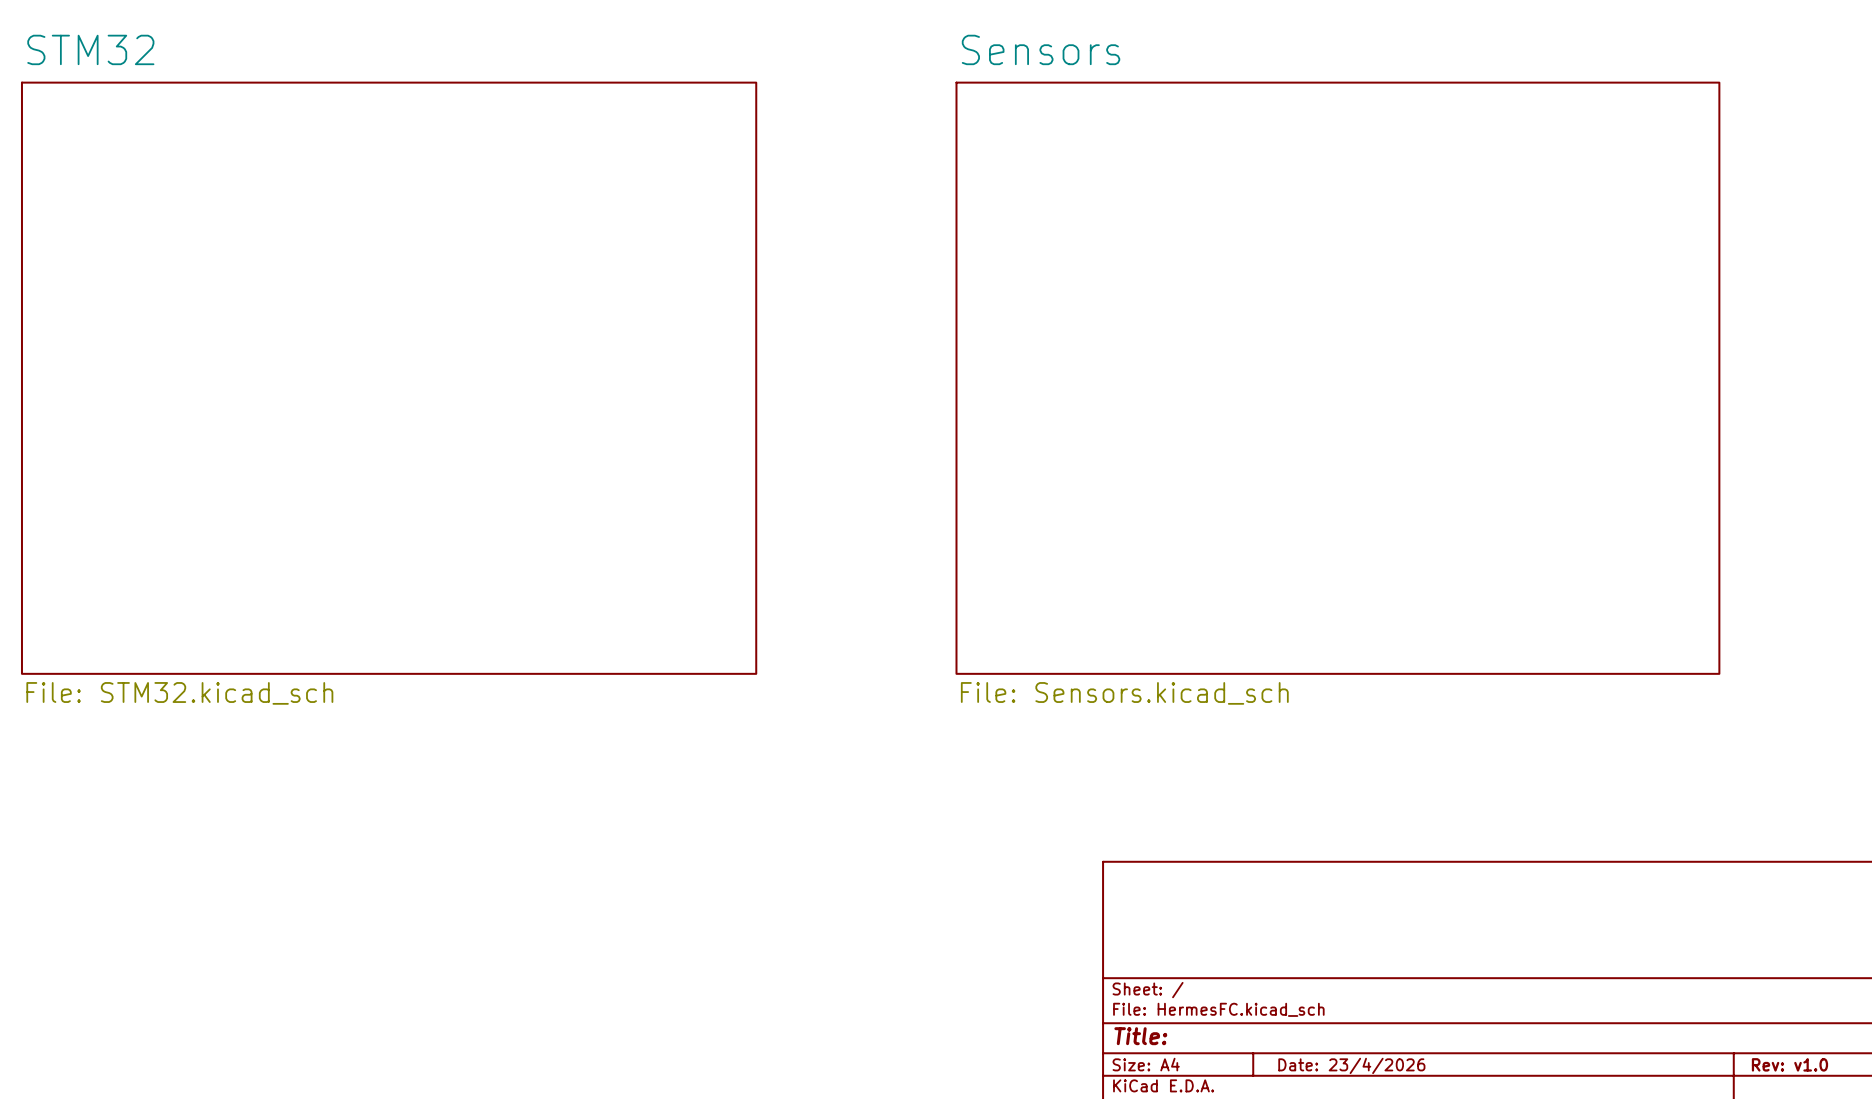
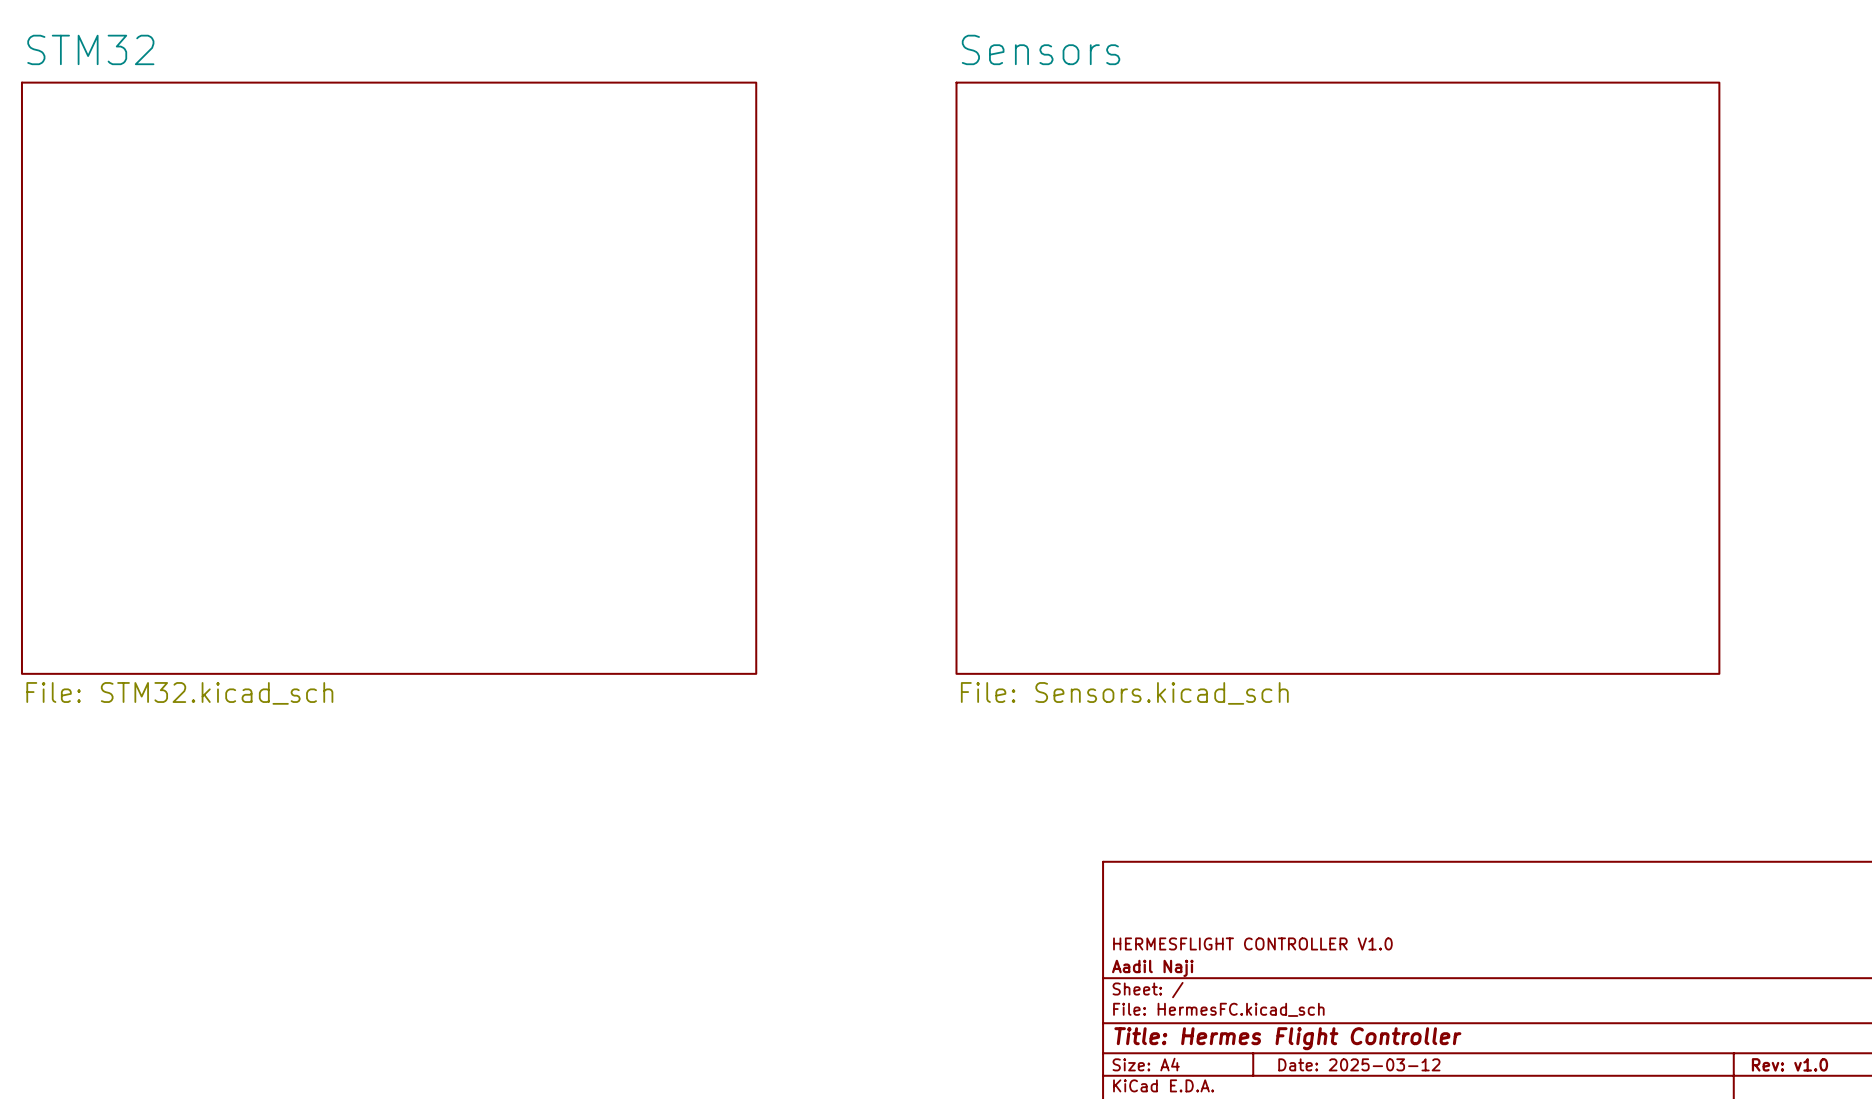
title block: none -> HERMESFLIGHT CONTROLLER V1.0 (1252, 943)
title block: none -> Aadil Naji (1152, 968)
title block: Title: (1140, 1036) -> Title: Hermes Flight Controller (1287, 1038)
title block: Date: 23/4/2026 (1351, 1065) -> Date: 2025-03-12 (1359, 1064)

